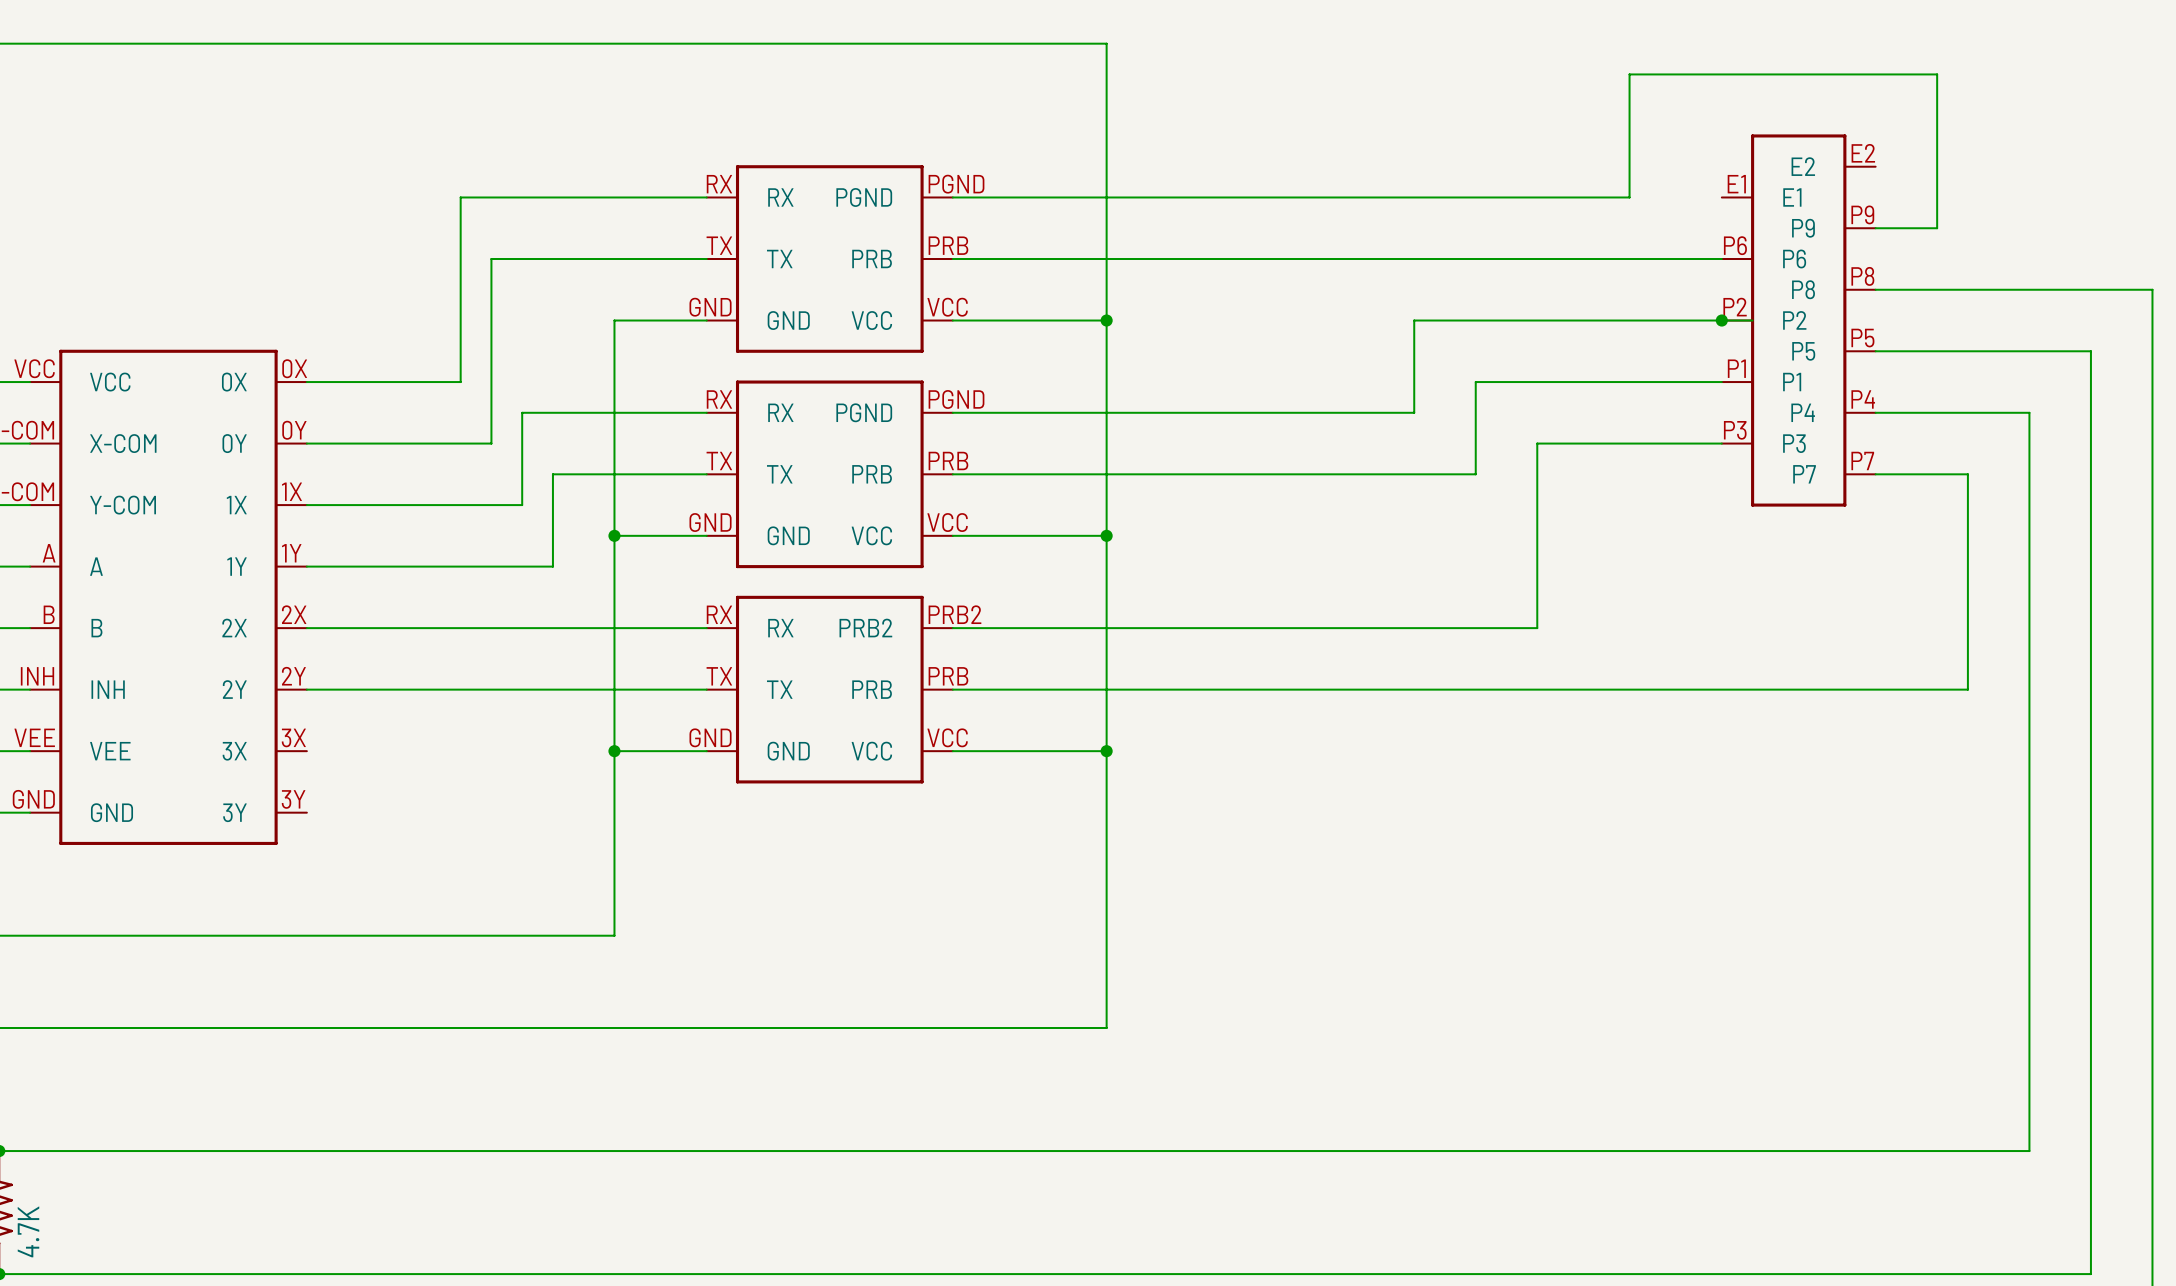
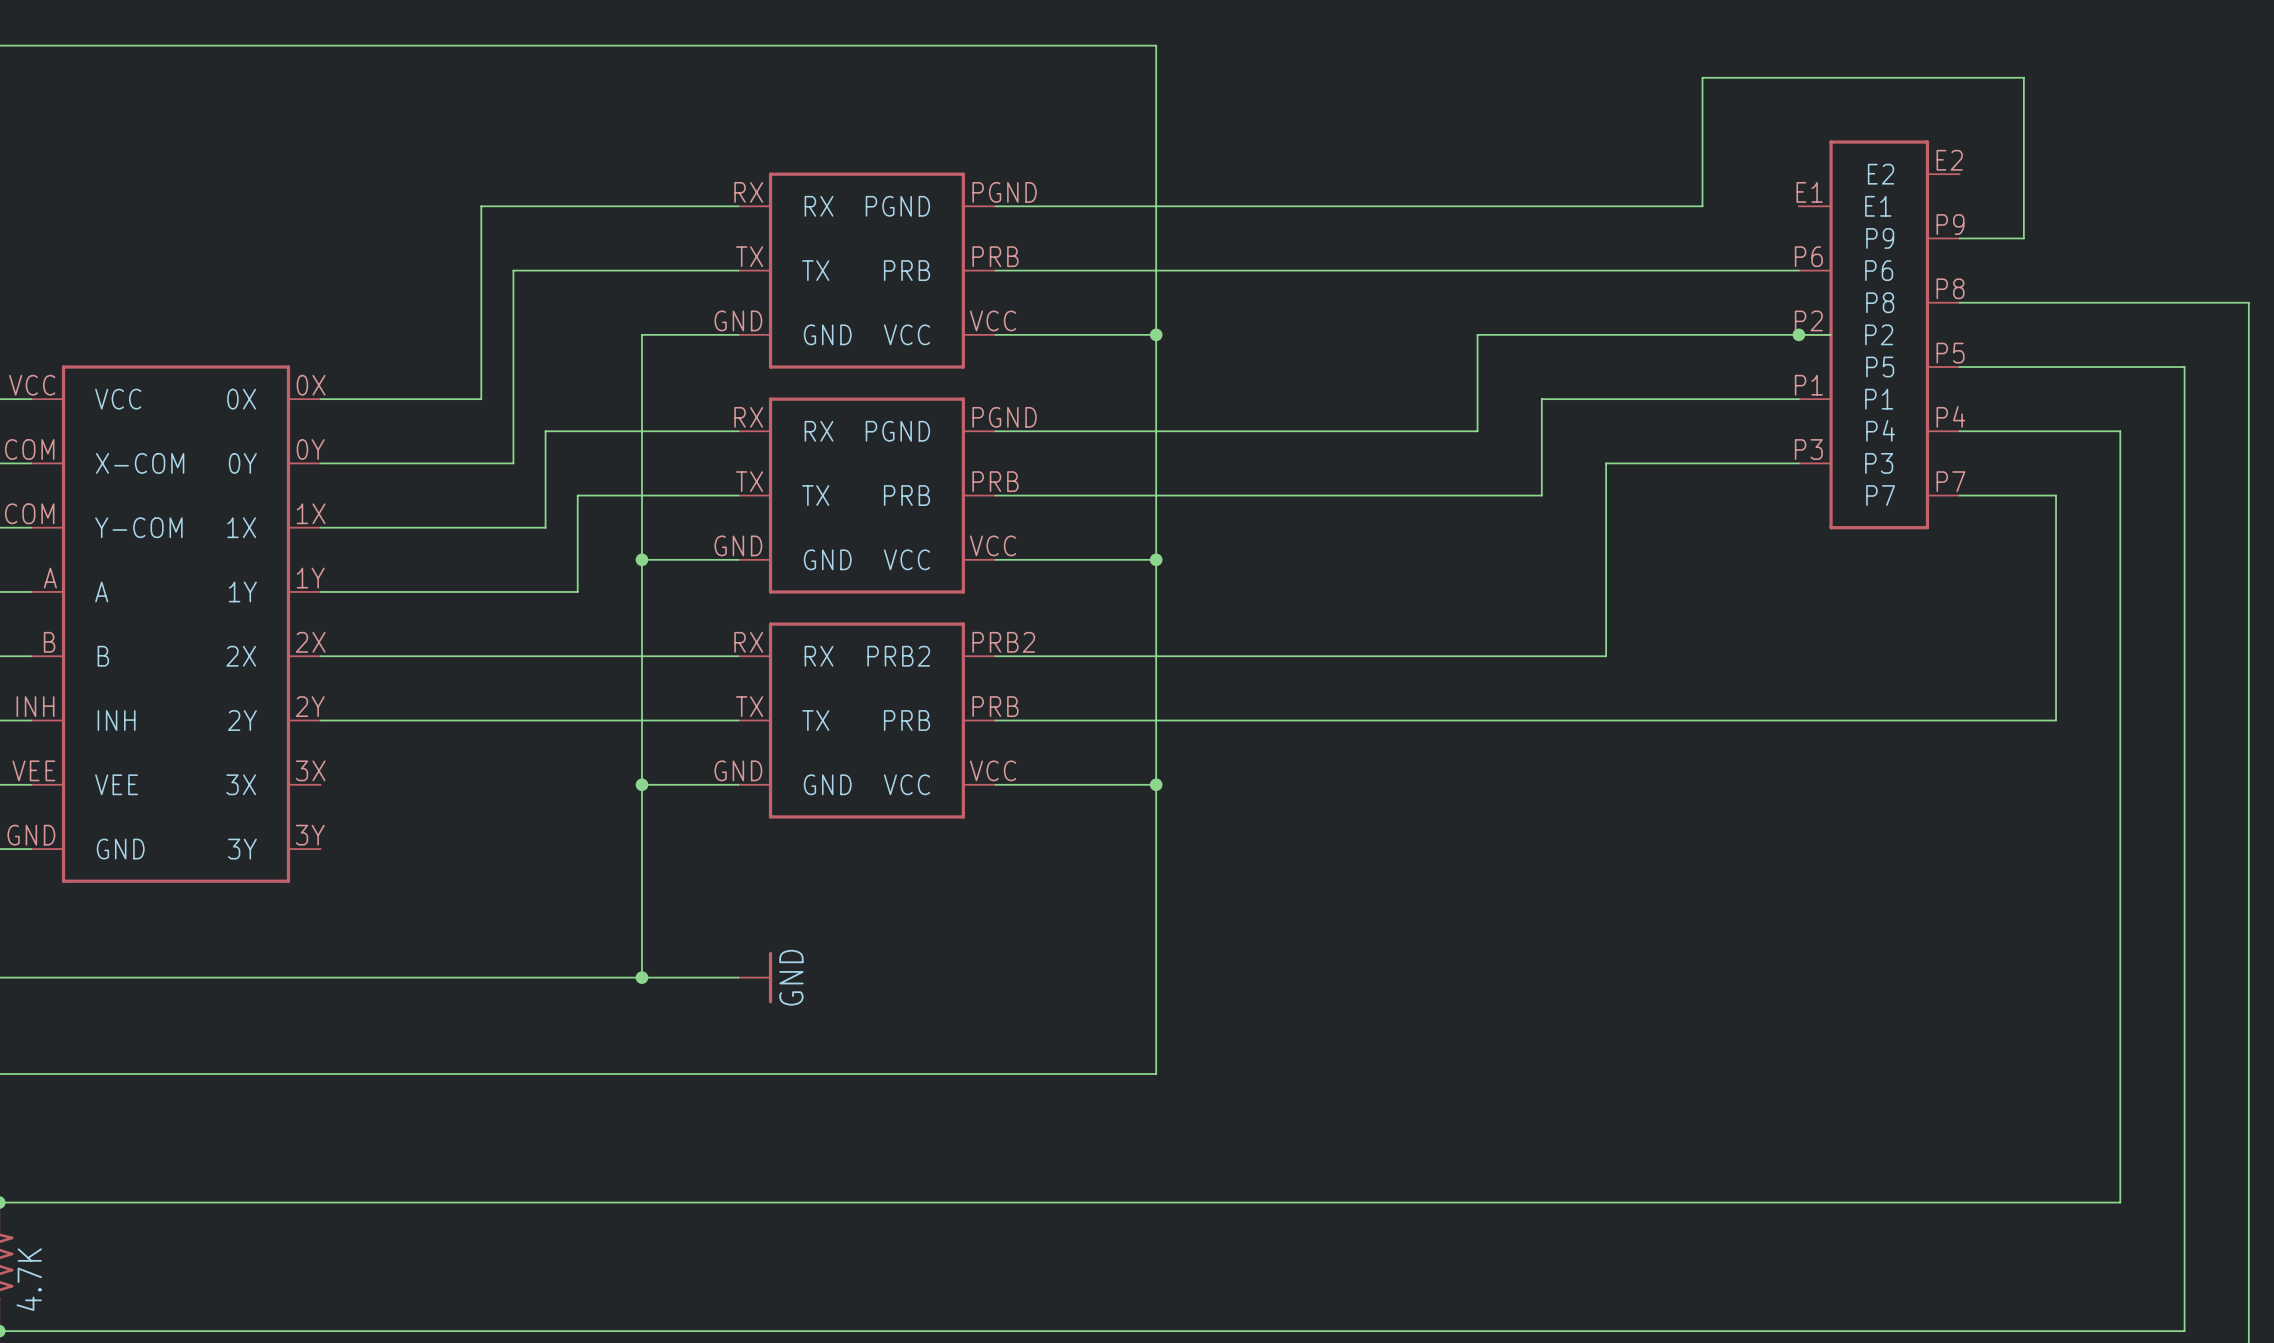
wire: none -> (641, 977) (738, 977)
junction: none -> (641, 977)
power symbol: none -> GND (755, 977)

